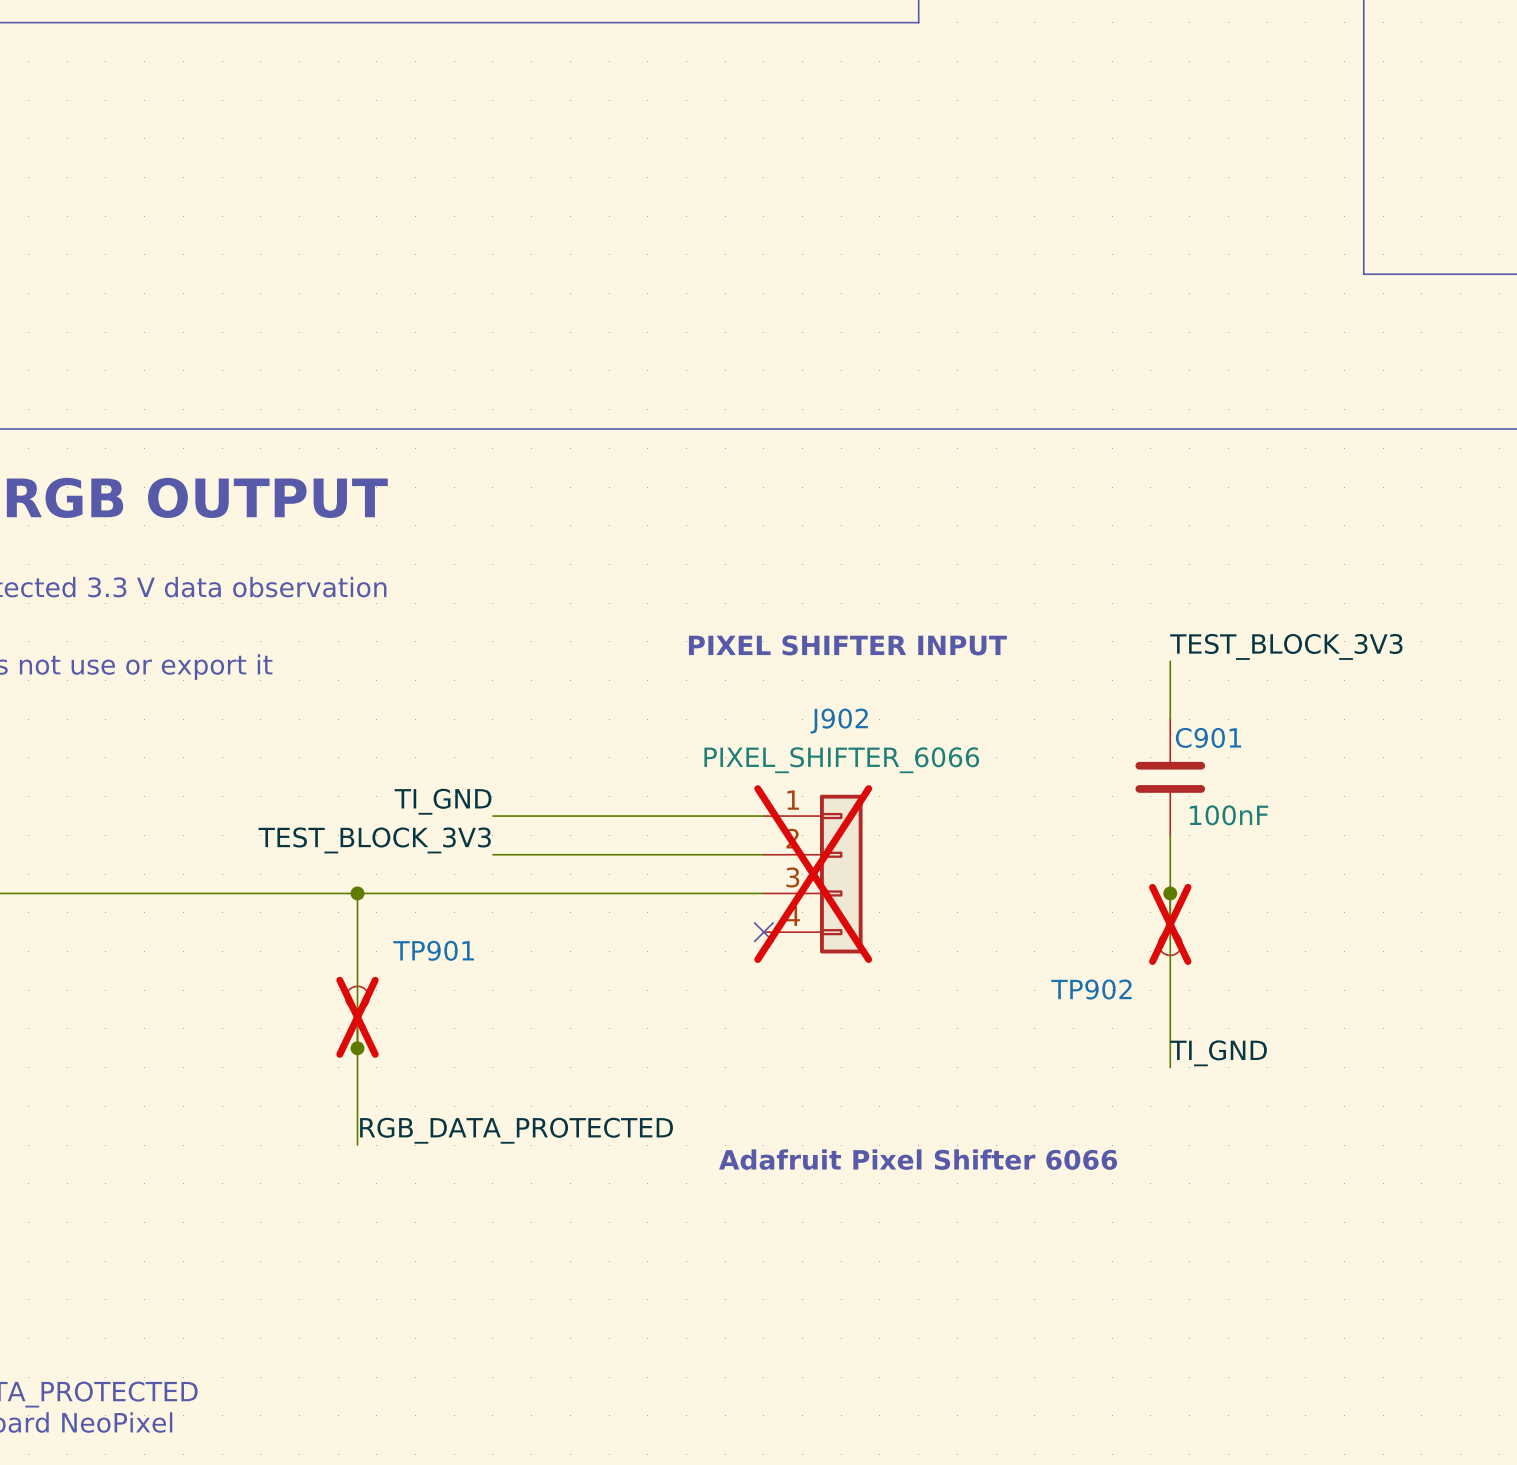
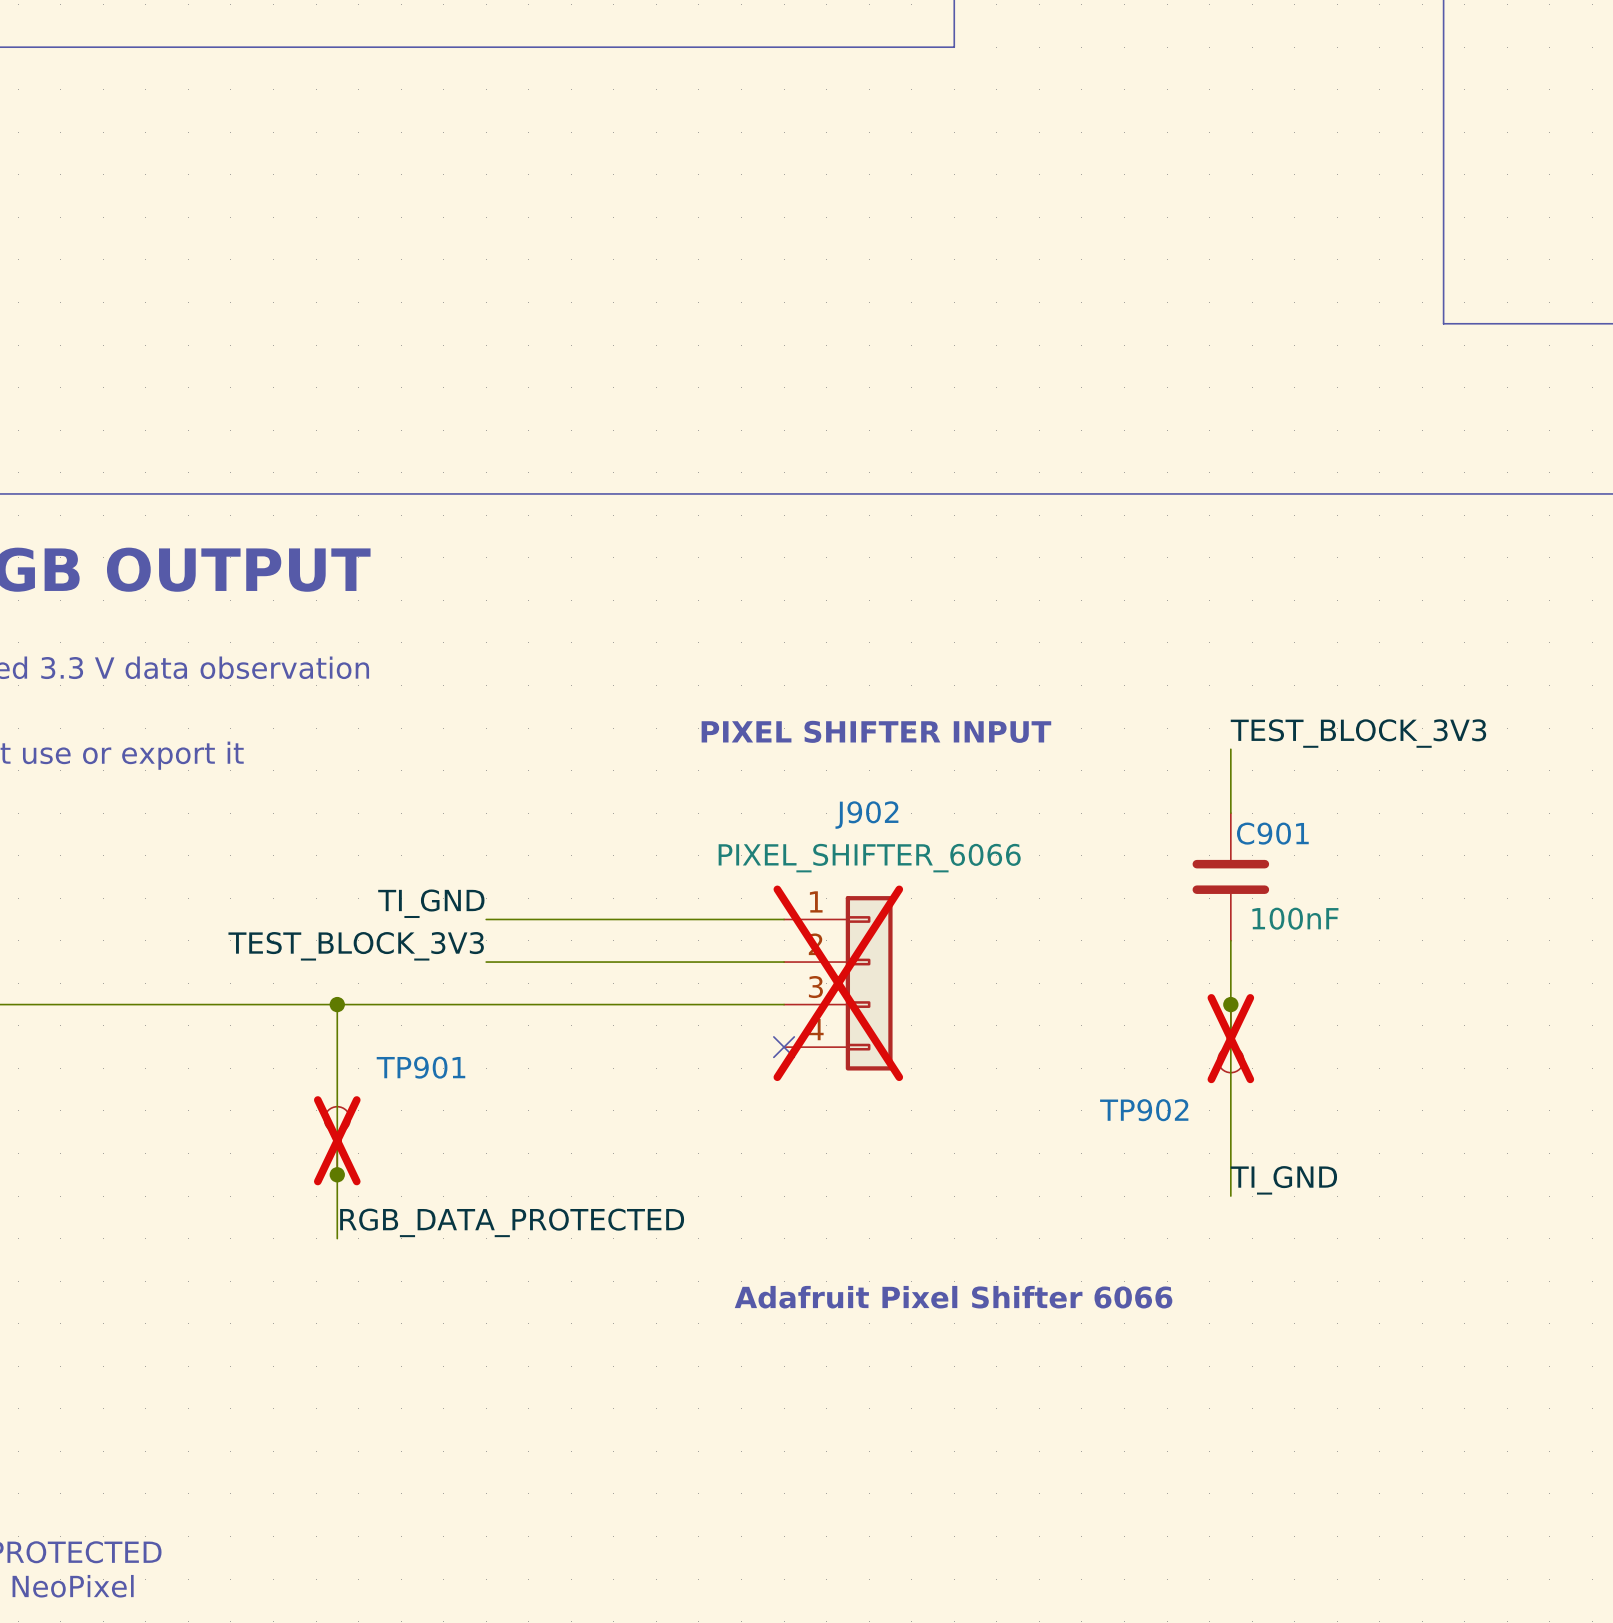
wire: (357, 1106) (357, 1145) -> none
label position: RGB_DATA_PROTECTED (516, 1130) -> RGB_DATA_PROTECTED (512, 1222)

